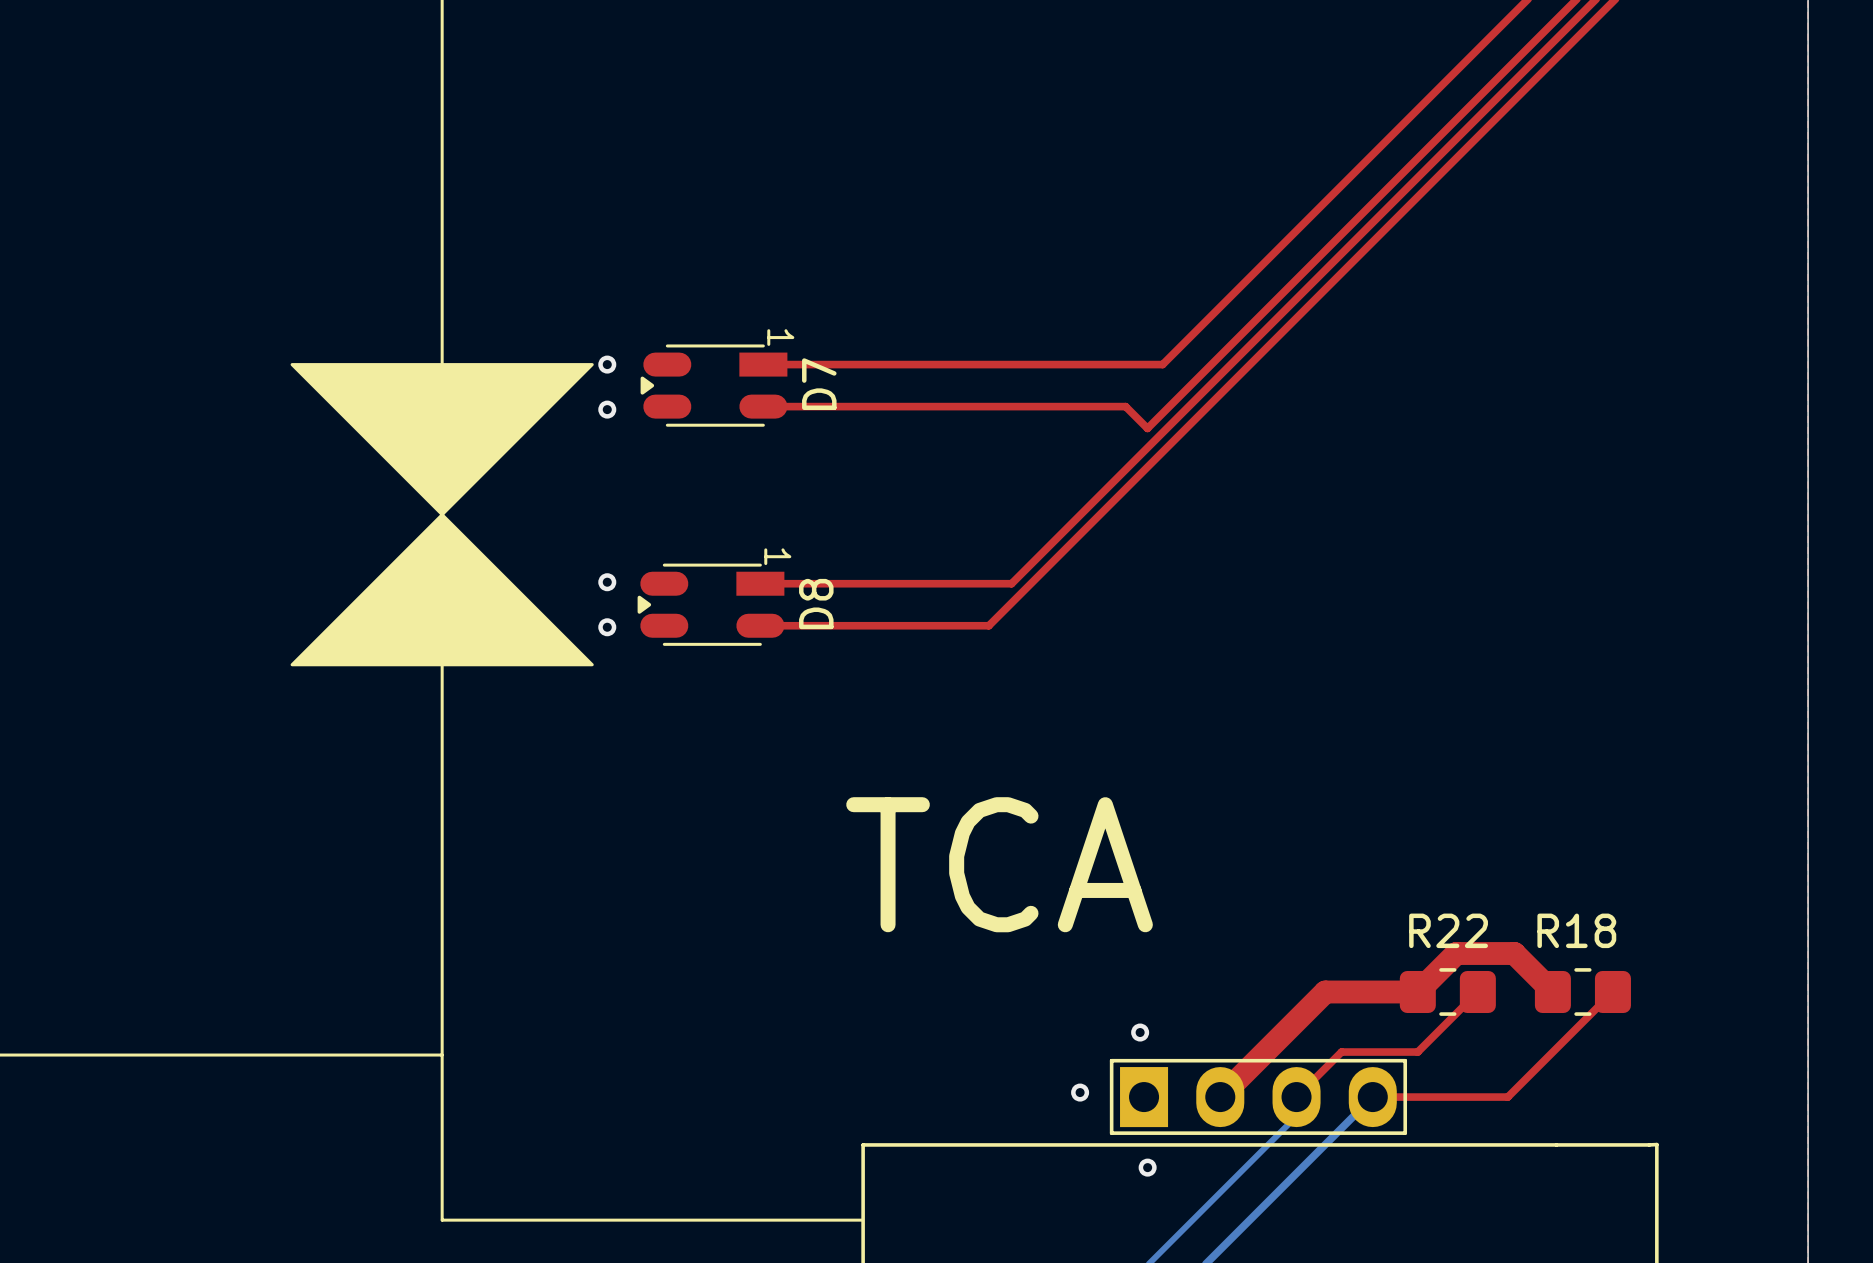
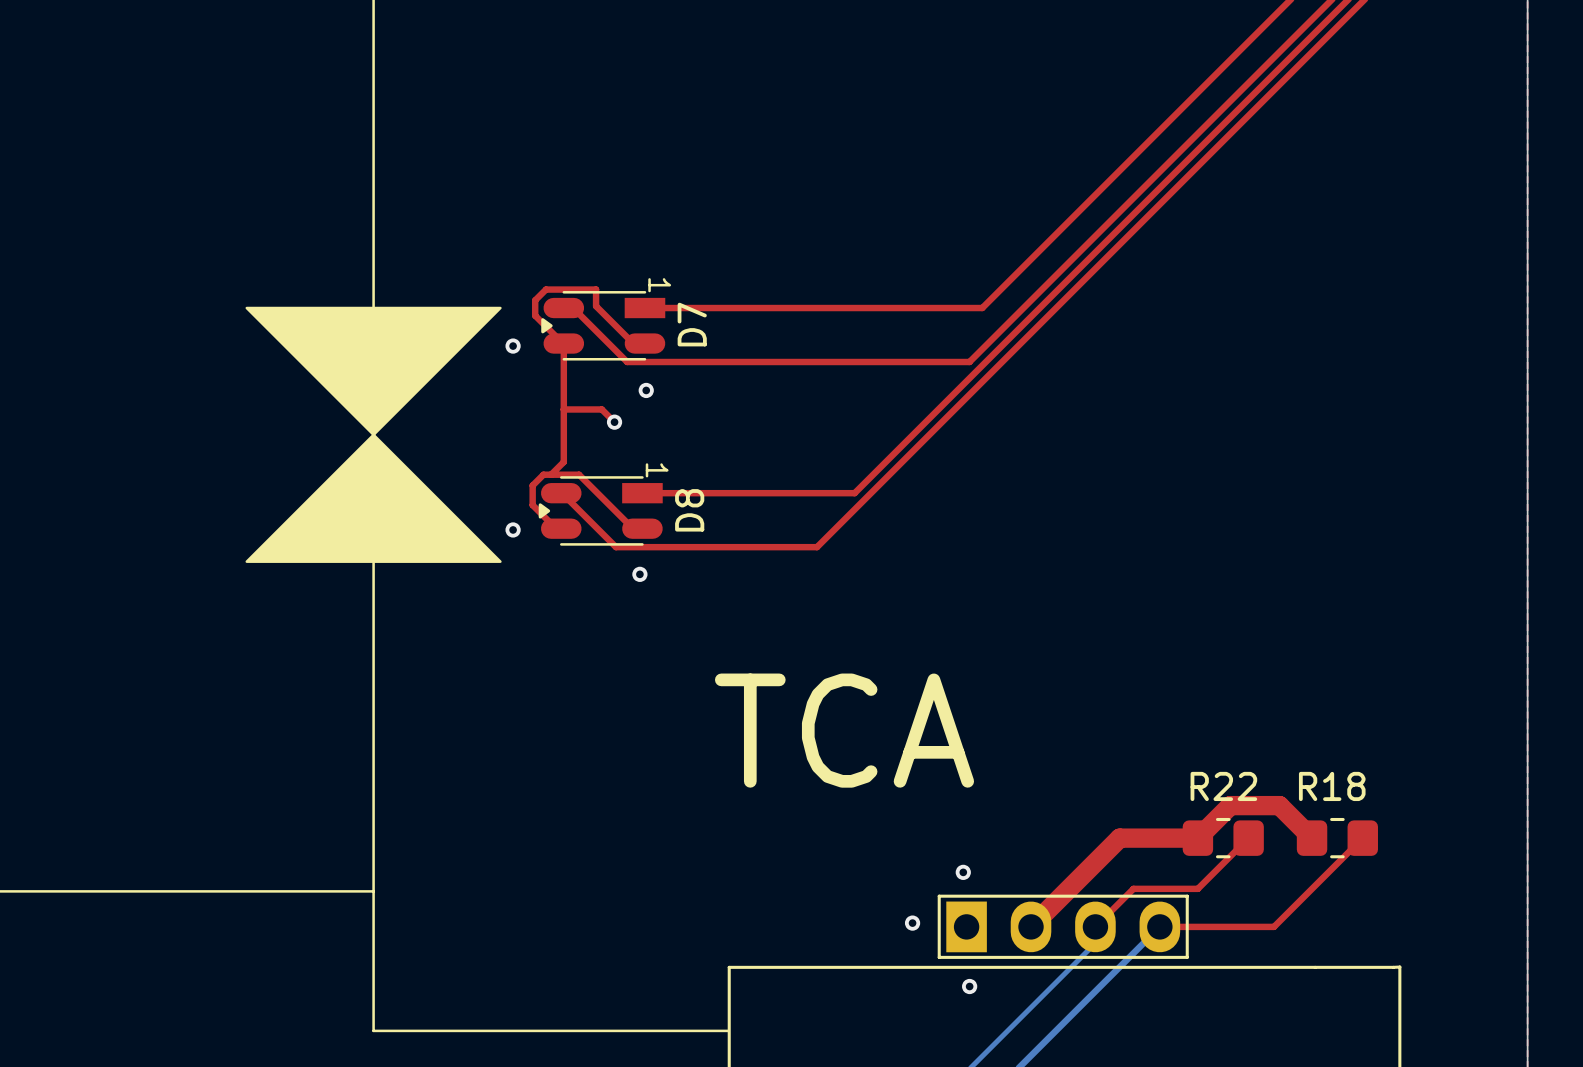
via: (607, 364) -> none
top track: none -> (563, 343) (535, 315) (535, 300) (546, 289) (596, 289) (596, 306) (633, 343)
top track: none -> (563, 343) (563, 462) (551, 474)
top track: (763, 406) (1125, 406) (1147, 428) -> (573, 308) (627, 362) (969, 362)
via: none -> (646, 390)
top track: none -> (563, 409) (601, 409) (614, 422)
via: none -> (614, 422)
via: (607, 582) -> none
top track: none -> (556, 528) (532, 505) (532, 485) (543, 474) (579, 474) (633, 528)
top track: (760, 625) (988, 625) -> (562, 493) (616, 547) (817, 547) (835, 528)
via: none -> (639, 574)

